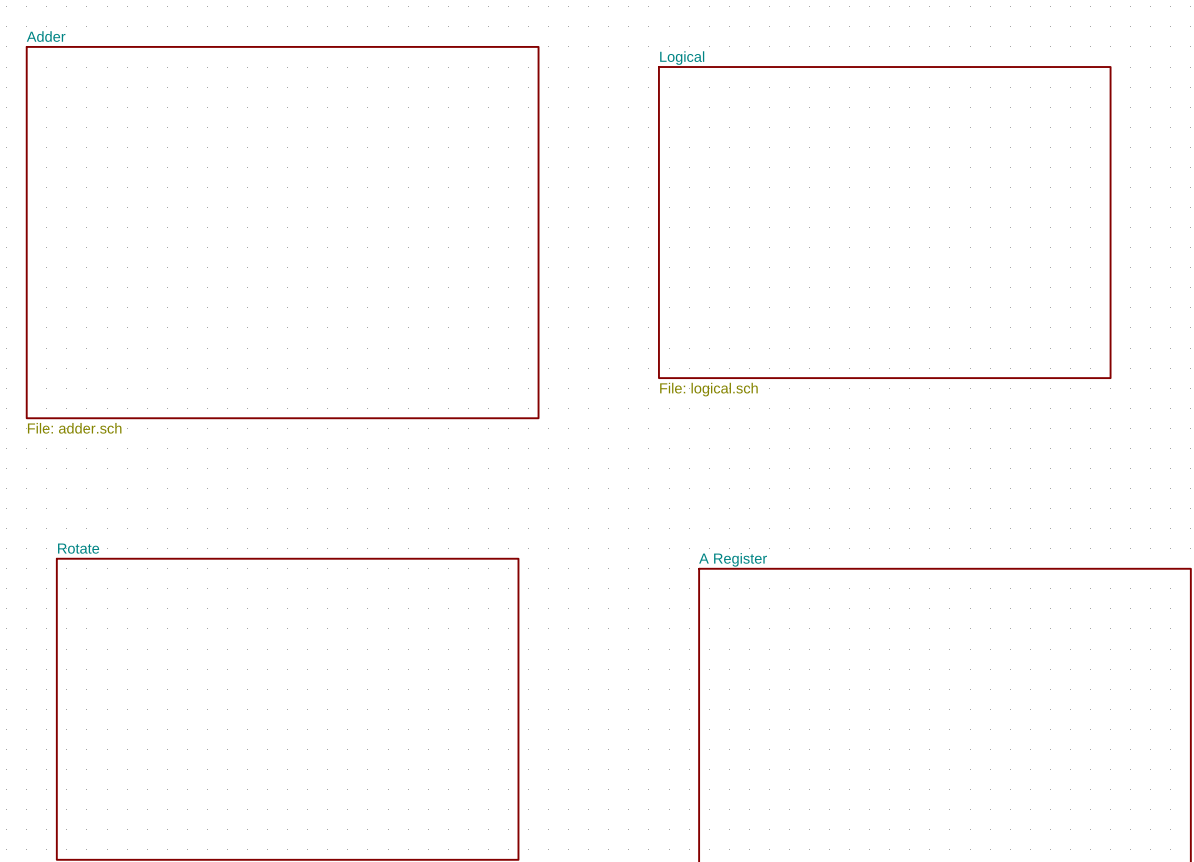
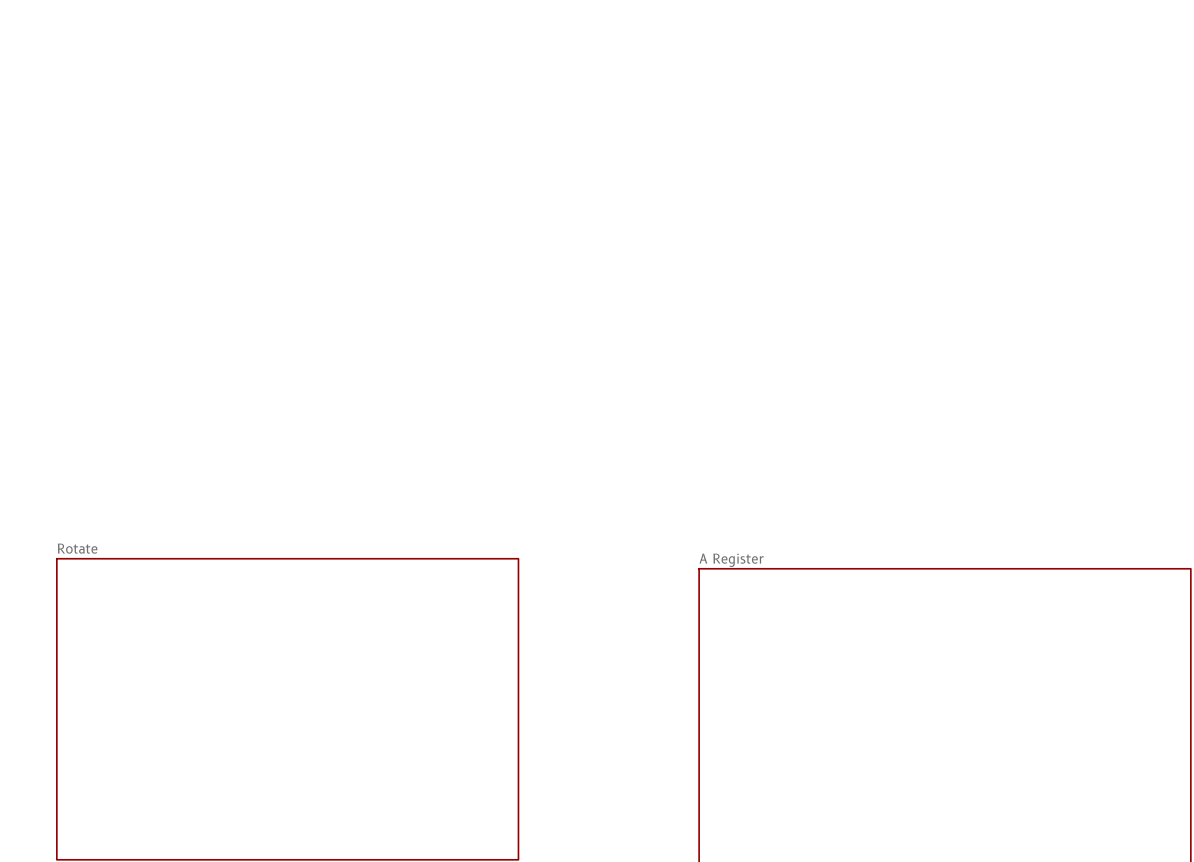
sheet Logical: File: logical.sch (884, 222) -> none
sheet Adder: File: adder.sch (282, 232) -> none

